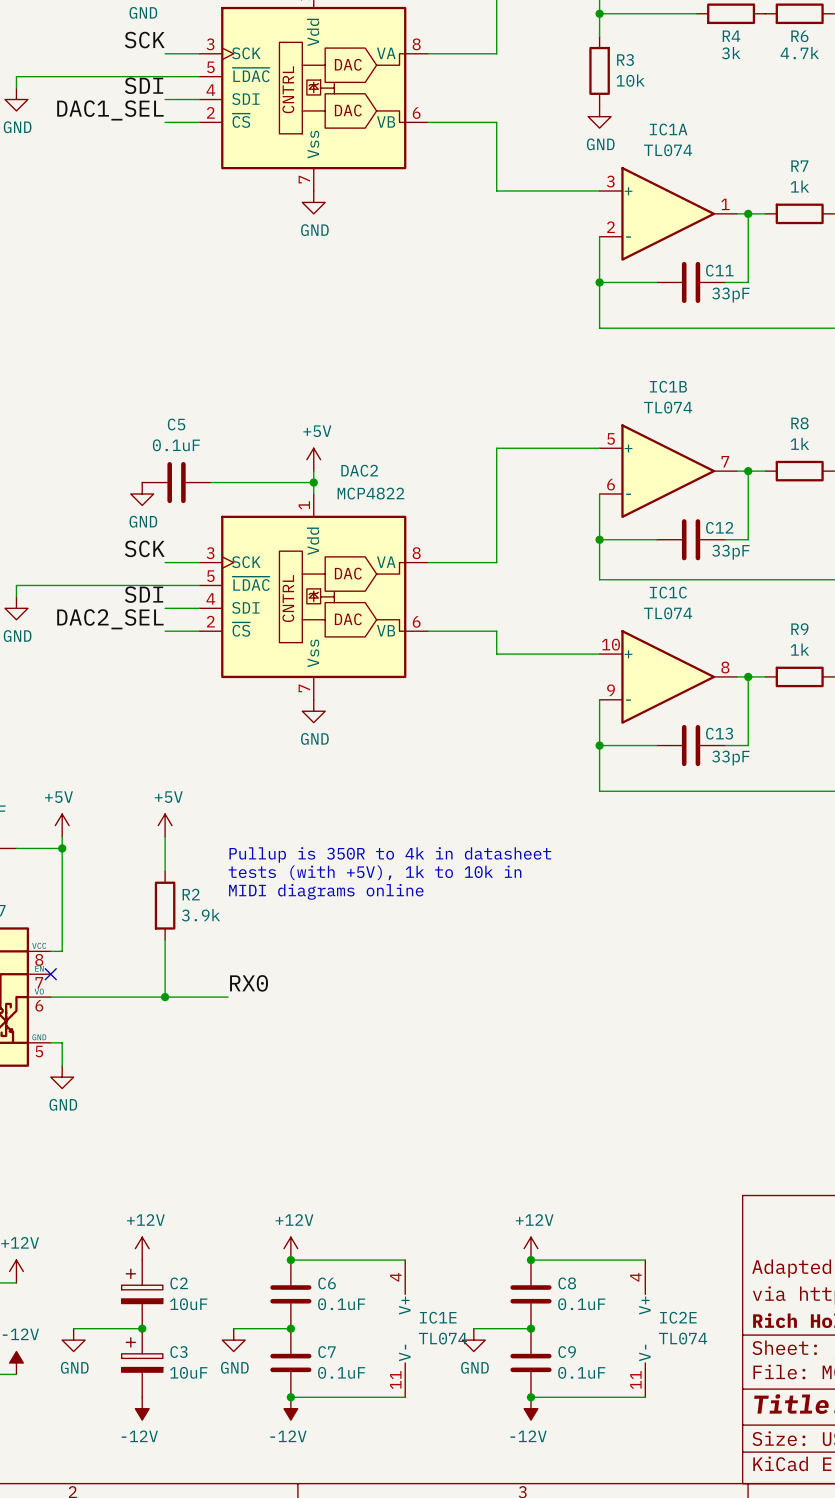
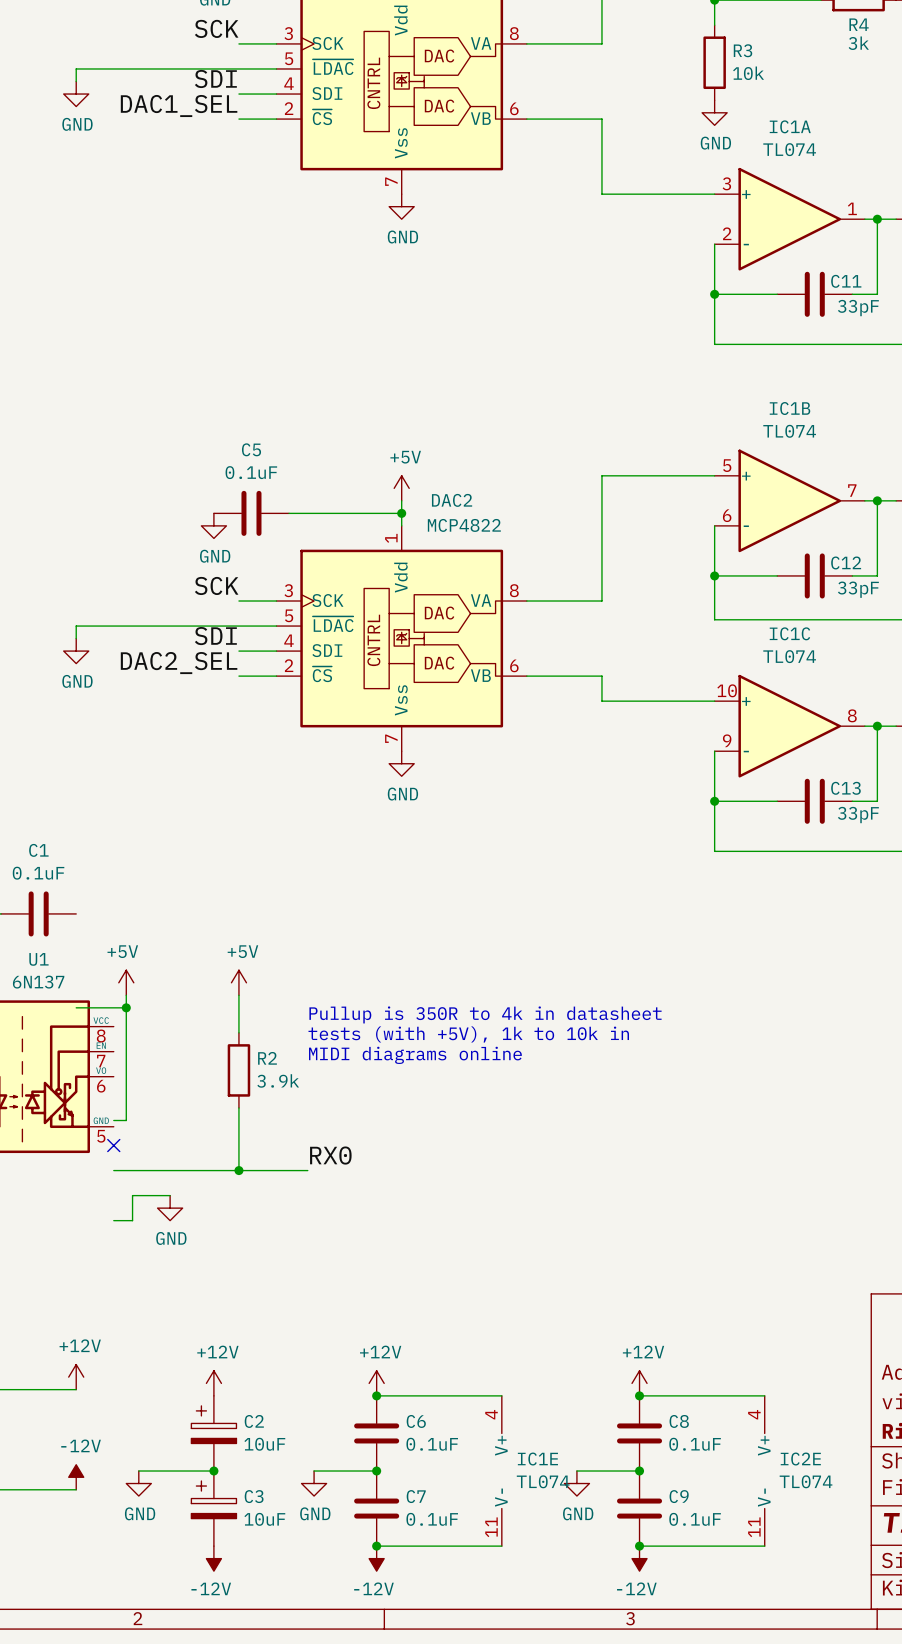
power symbol: +5V (62, 825) -> none
power symbol: +5V (165, 825) -> none
wire: (62, 837) (62, 922) -> none
wire: (165, 837) (165, 871) -> none
wire: (16, 848) (62, 848) -> (76, 1007) (126, 1007)
junction: (62, 848) -> none
text position: Pullup is 350R to 4k in datasheet (390, 854) -> Pullup is 350R to 4k in datasheet (485, 1014)
text position: tests (with +5V), 1k to 10k in (374, 872) -> tests (with +5V), 1k to 10k in (468, 1034)
text position: MIDI diagrams online (326, 891) -> MIDI diagrams online (415, 1055)
R2 position: (165, 905) -> (238, 1070)
power symbol: none -> +5V (126, 982)
power symbol: none -> +5V (238, 982)
junction: none -> (126, 1007)
wire: (50, 951) (62, 951) -> (113, 1120) (126, 1120) (126, 1026)
wire: (165, 957) (165, 997) -> none
no-connect mark: (50, 974) -> none
label position: RX0 (249, 983) -> RX0 (330, 1155)
wire: (50, 997) (227, 997) -> (113, 1170) (307, 1170)
junction: (165, 997) -> none
wire: none -> (238, 1107) (238, 1170)
wire: (50, 1042) (62, 1042) (62, 1065) -> none
no-connect mark: none -> (113, 1145)
power symbol position: GND (62, 1077) -> GND (170, 1208)
junction: none -> (238, 1170)
wire: none -> (170, 1195) (132, 1195) (132, 1220) (113, 1220)
power symbol position: +12V (142, 1248) -> +12V (213, 1383)
power symbol position: +12V (290, 1248) -> +12V (376, 1383)
power symbol position: +12V (530, 1248) -> +12V (639, 1383)
wire: (290, 1260) (405, 1260) -> (376, 1395) (501, 1395)
junction: (290, 1260) -> none
wire: (530, 1260) (645, 1260) -> (639, 1395) (764, 1395)
junction: (530, 1260) -> none
junction: none -> (376, 1395)
junction: none -> (639, 1395)
C2 position: (142, 1294) -> (213, 1433)
C6 position: (290, 1294) -> (376, 1433)
C8 position: (530, 1294) -> (639, 1433)
wire: (73, 1328) (142, 1328) -> (138, 1471) (213, 1471)
junction position: (142, 1328) -> (213, 1471)
wire: (233, 1328) (290, 1328) -> (314, 1471) (376, 1471)
junction: (290, 1328) -> none
IC1E position: (405, 1328) -> (501, 1471)
wire: (473, 1328) (530, 1328) -> (576, 1471) (639, 1471)
junction: (530, 1328) -> none
IC2E position: (645, 1328) -> (764, 1471)
power symbol position: GND (73, 1340) -> GND (138, 1483)
power symbol position: GND (233, 1340) -> GND (314, 1483)
power symbol position: GND (473, 1340) -> GND (576, 1483)
junction: none -> (376, 1471)
junction: none -> (639, 1471)
C3 position: (142, 1362) -> (213, 1508)
C7 position: (290, 1362) -> (376, 1508)
C9 position: (530, 1362) -> (639, 1508)
wire: (290, 1397) (405, 1397) -> (376, 1546) (501, 1546)
junction: (290, 1397) -> none
wire: (530, 1397) (645, 1397) -> (639, 1546) (764, 1546)
junction: (530, 1397) -> none
power symbol position: -12V (142, 1408) -> -12V (213, 1558)
power symbol position: -12V (290, 1408) -> -12V (376, 1558)
power symbol position: -12V (530, 1408) -> -12V (639, 1558)
junction: none -> (376, 1546)
junction: none -> (639, 1546)

